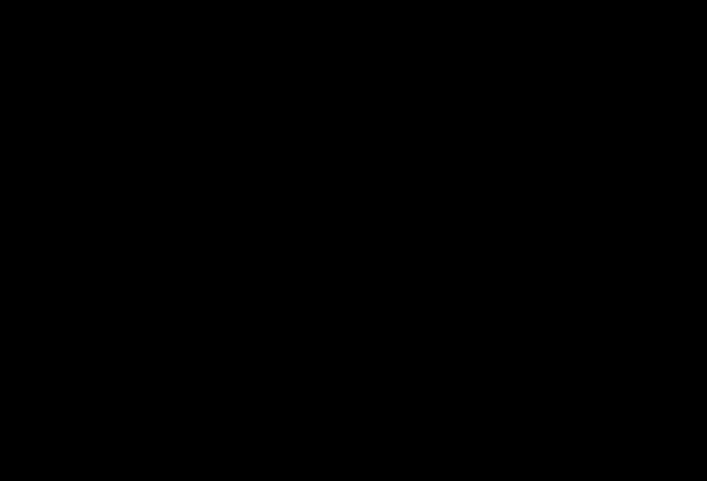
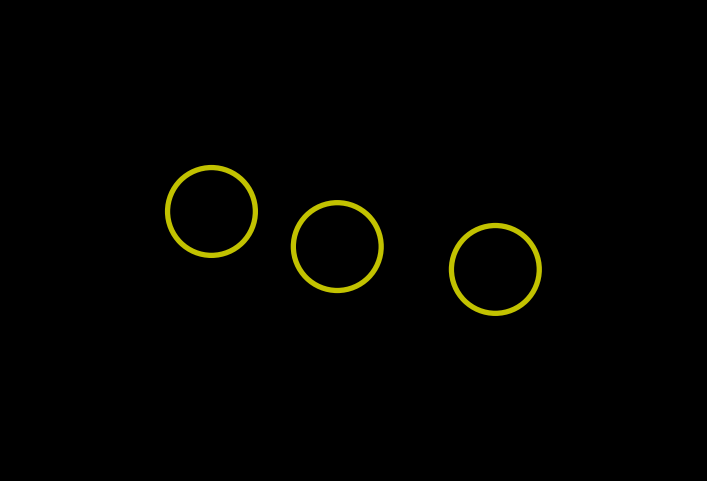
round board edge: none -> [164, 164, 259, 259]
round board edge: none -> [290, 200, 384, 294]
round board edge: none -> [448, 222, 542, 316]

